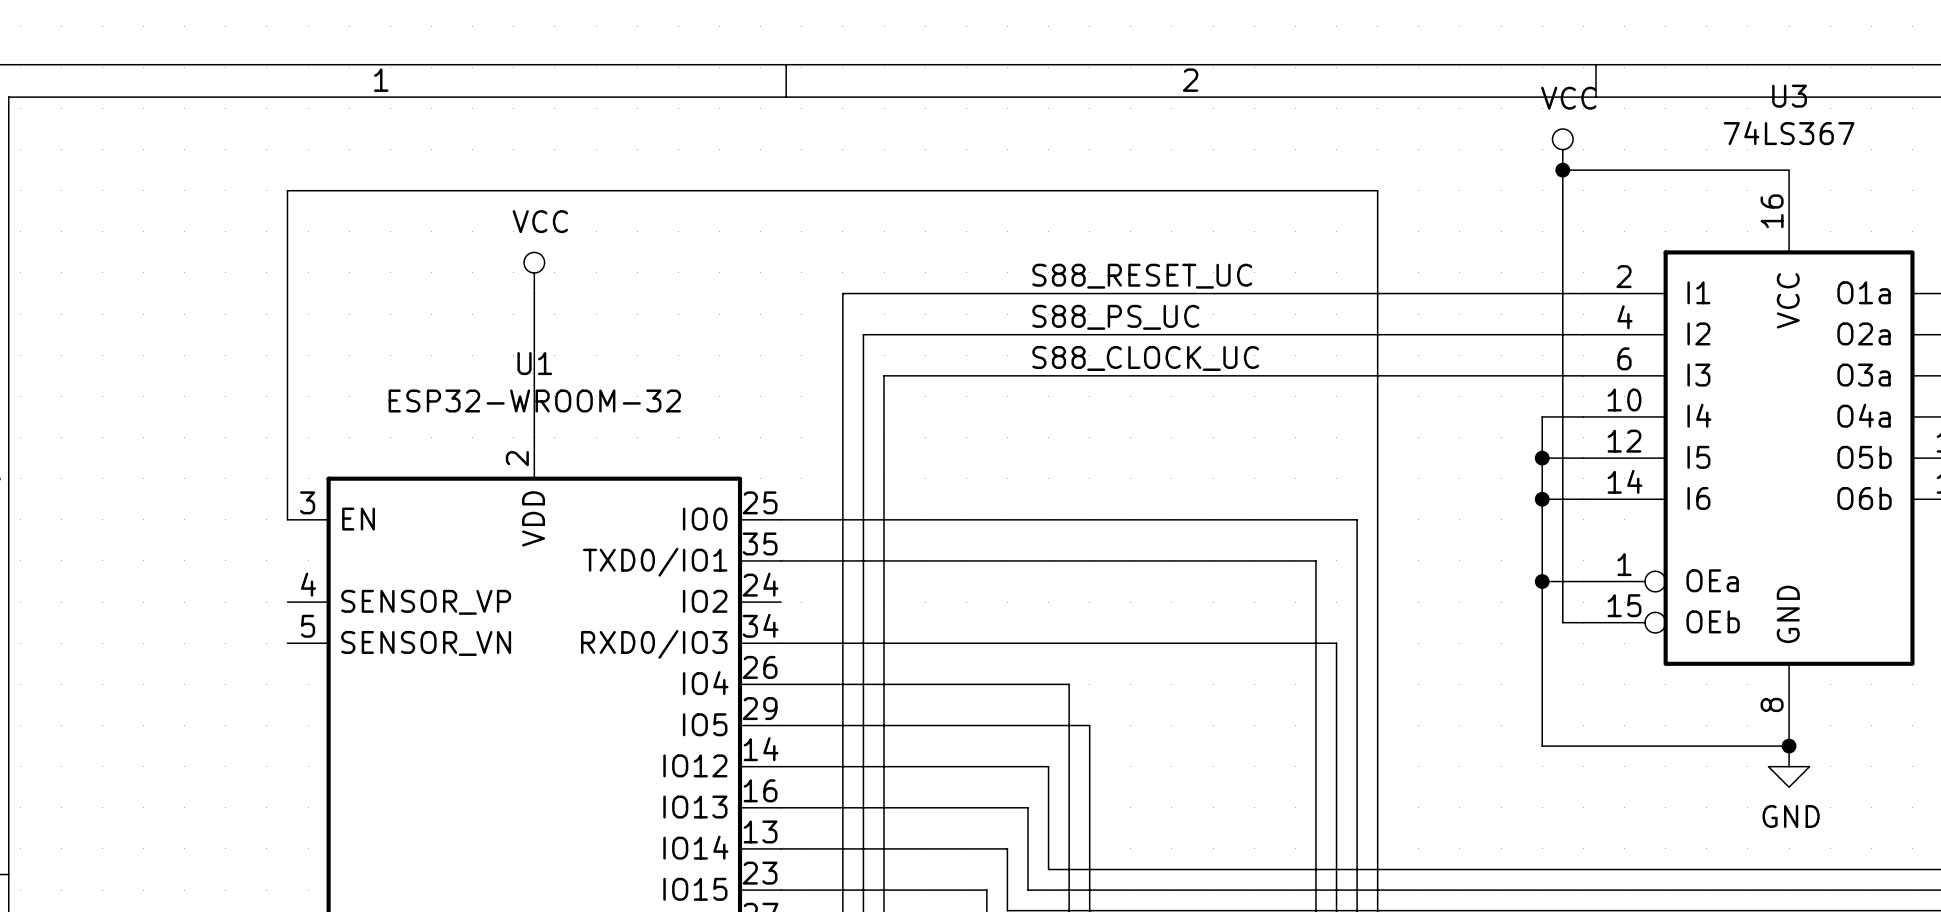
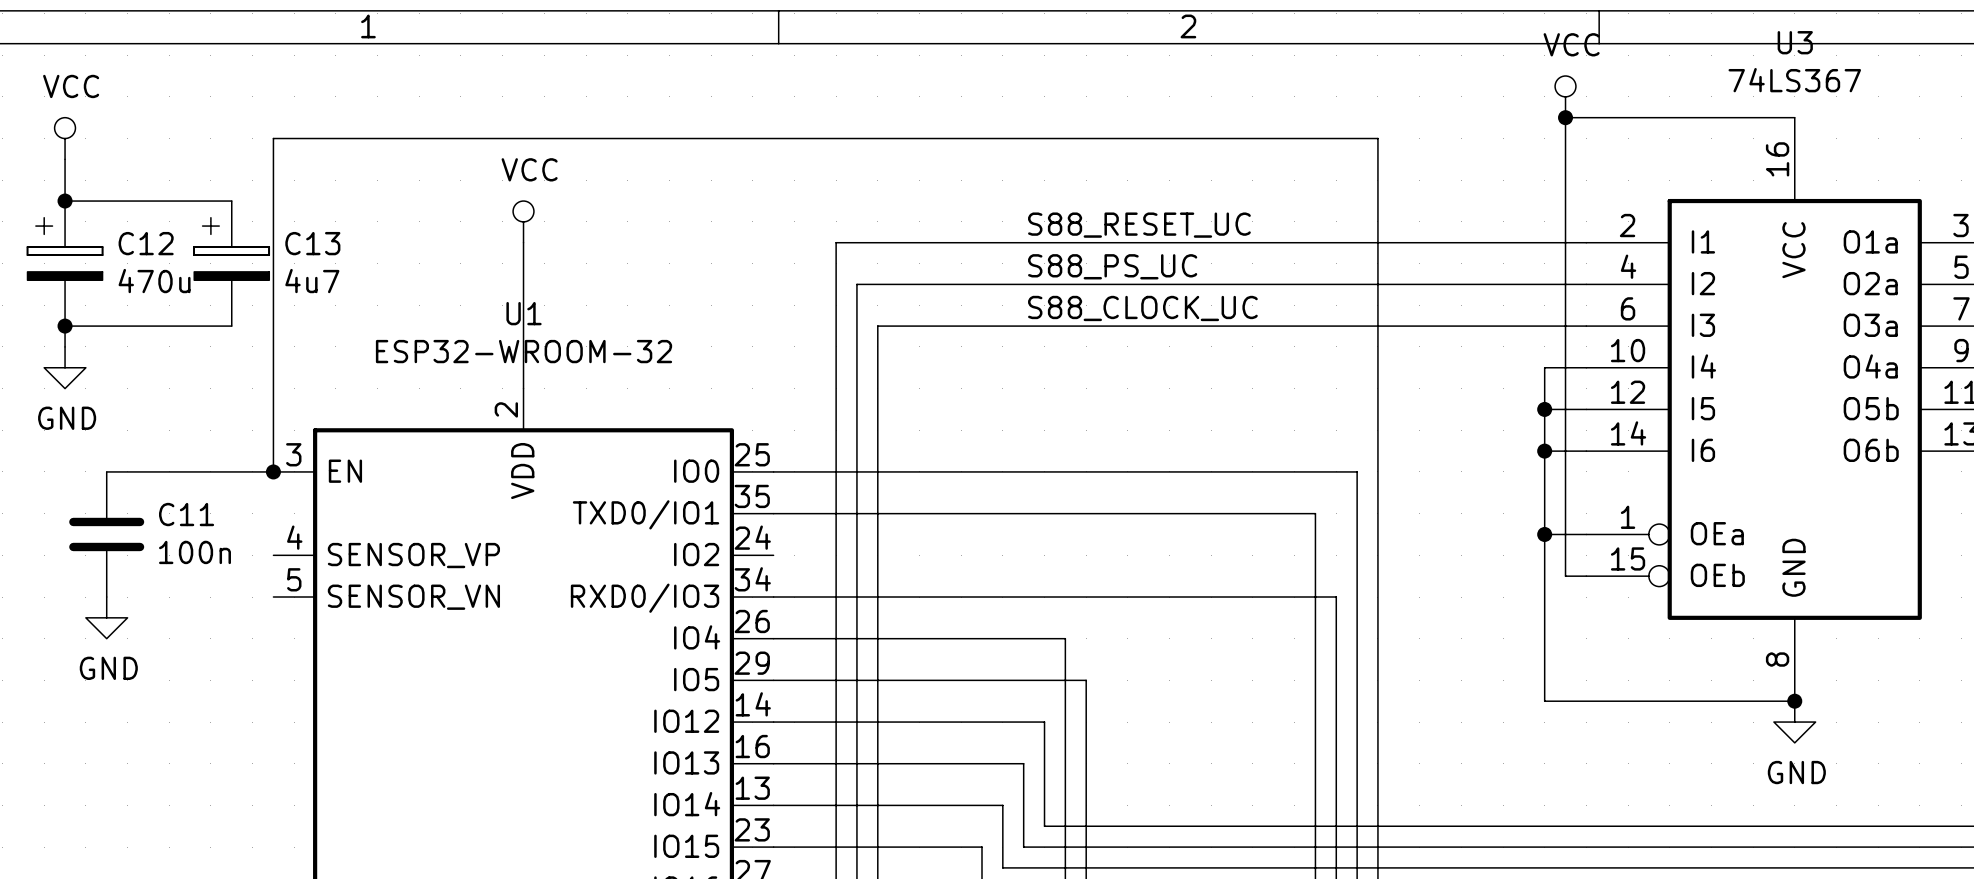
power symbol: none -> VCC (65, 138)
wire: none -> (65, 159) (65, 201) (231, 201)
junction: none -> (65, 201)
C12: none -> 470u (65, 263)
C13: none -> 4u7 (231, 263)
junction: none -> (65, 326)
wire: none -> (231, 326) (65, 326) (65, 346)
power symbol: none -> GND (65, 367)
wire: none -> (106, 471) (273, 471)
junction: none -> (273, 471)
C11: none -> 100n (106, 534)
power symbol: none -> GND (106, 617)

